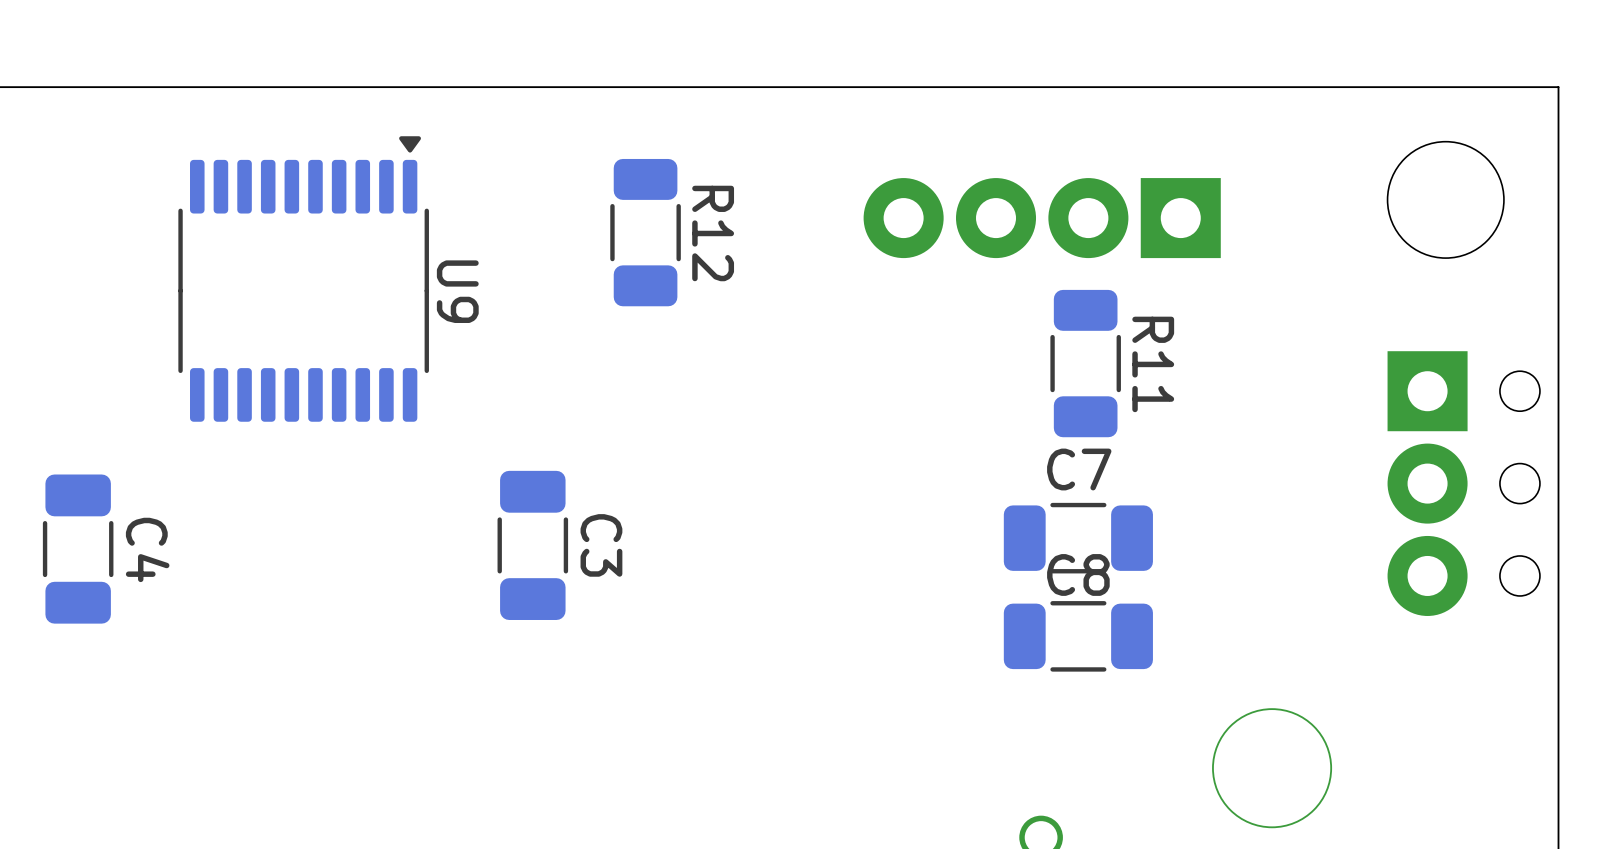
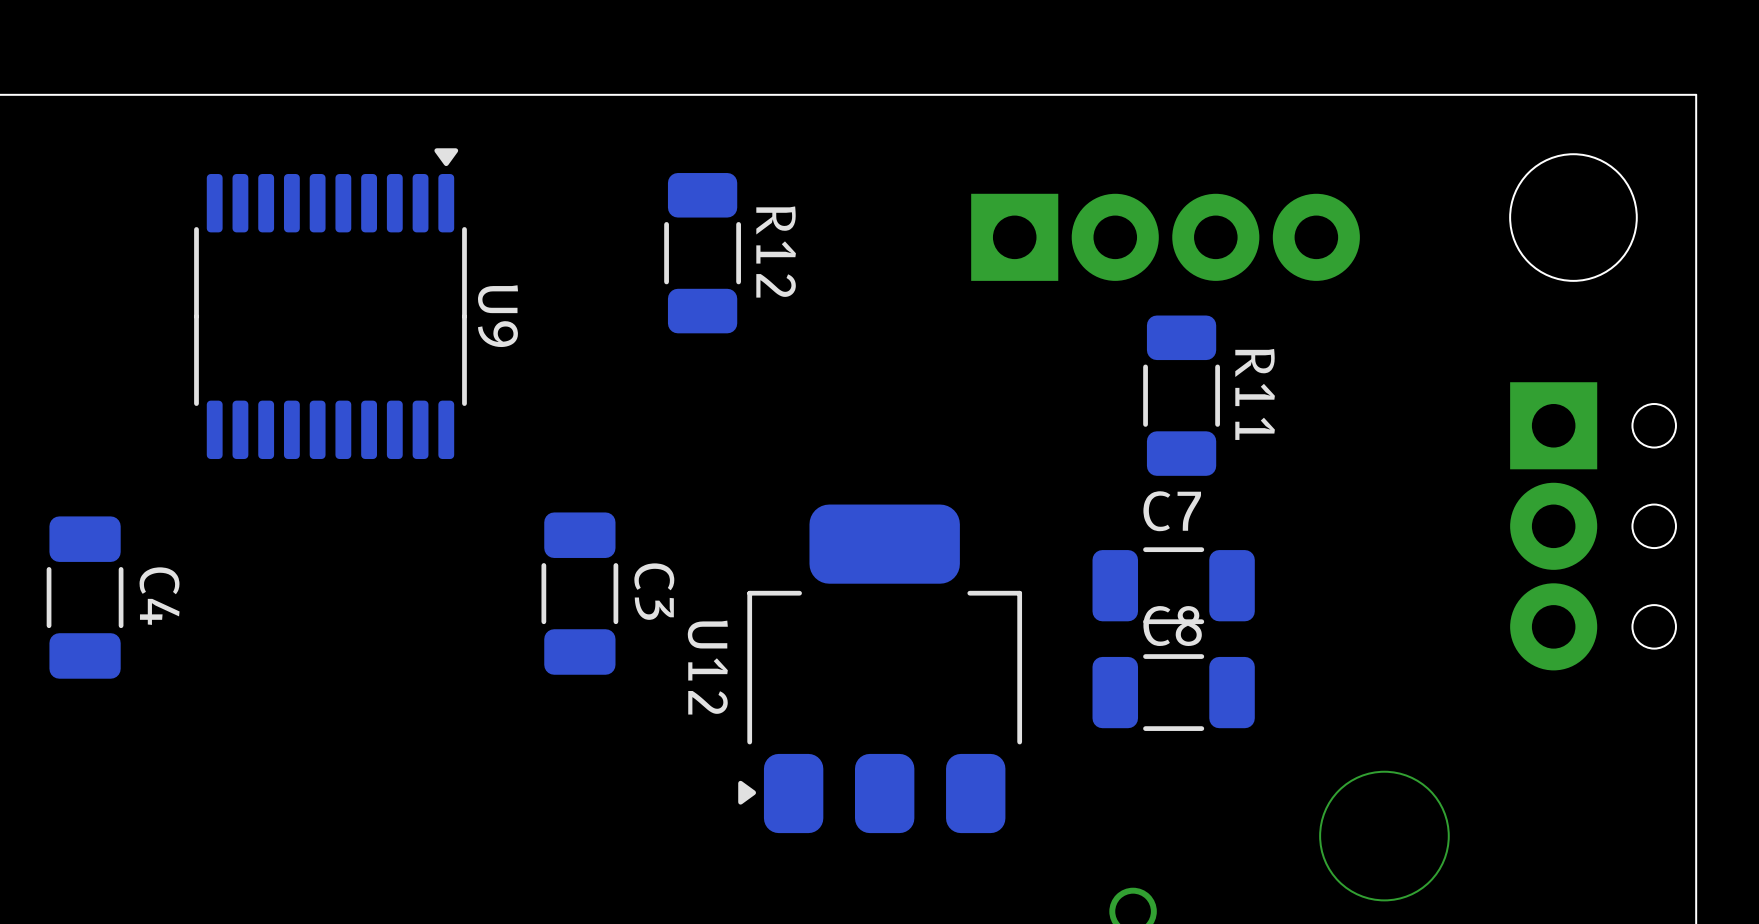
part rotation: 0° (1042, 218) -> 180° (1165, 237)
U12: none -> (880, 668)

